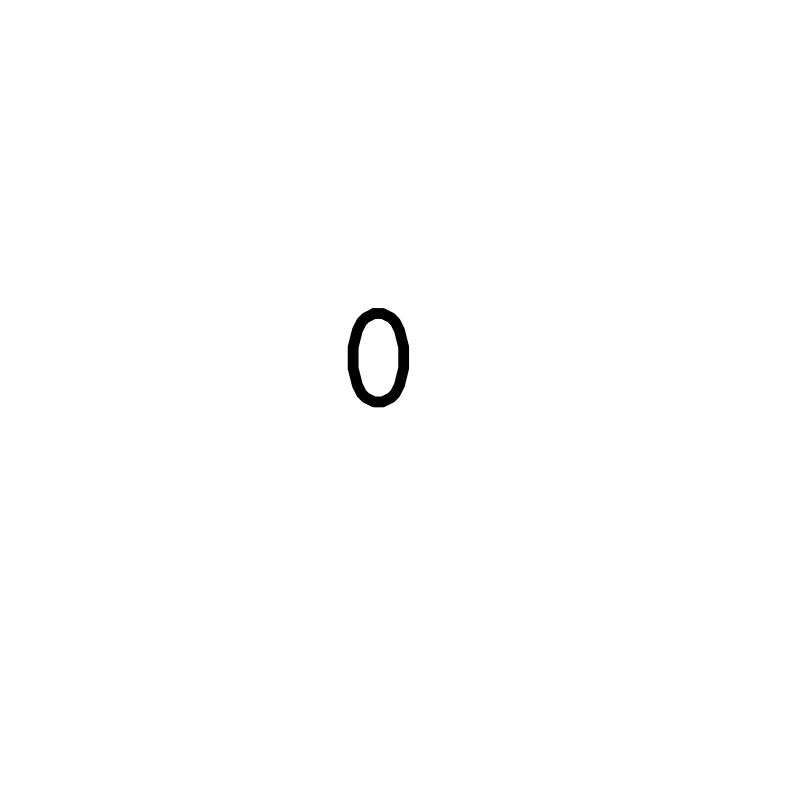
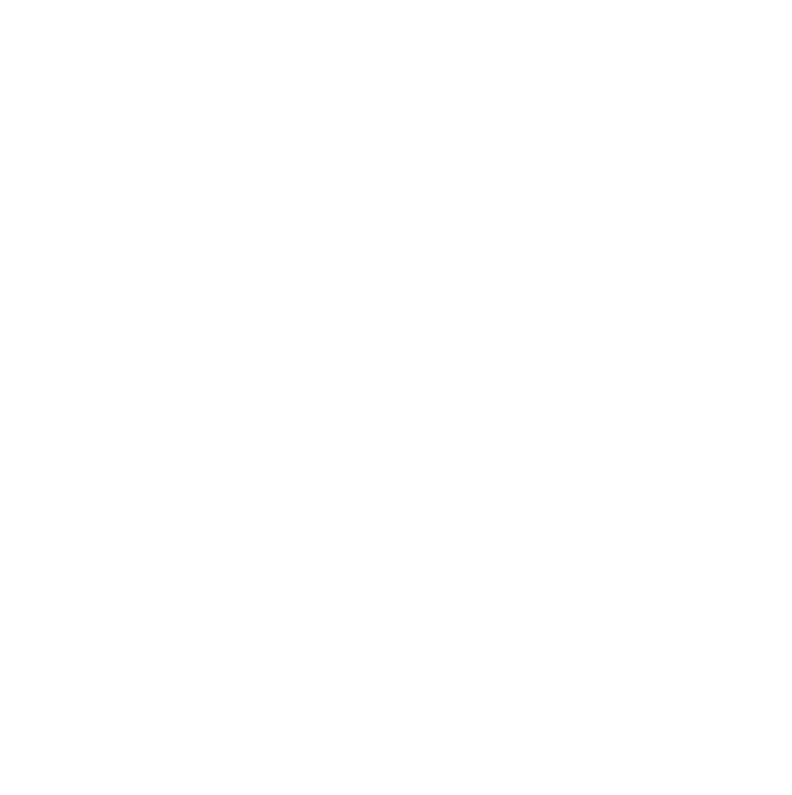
text: 0 (378, 357) -> none

